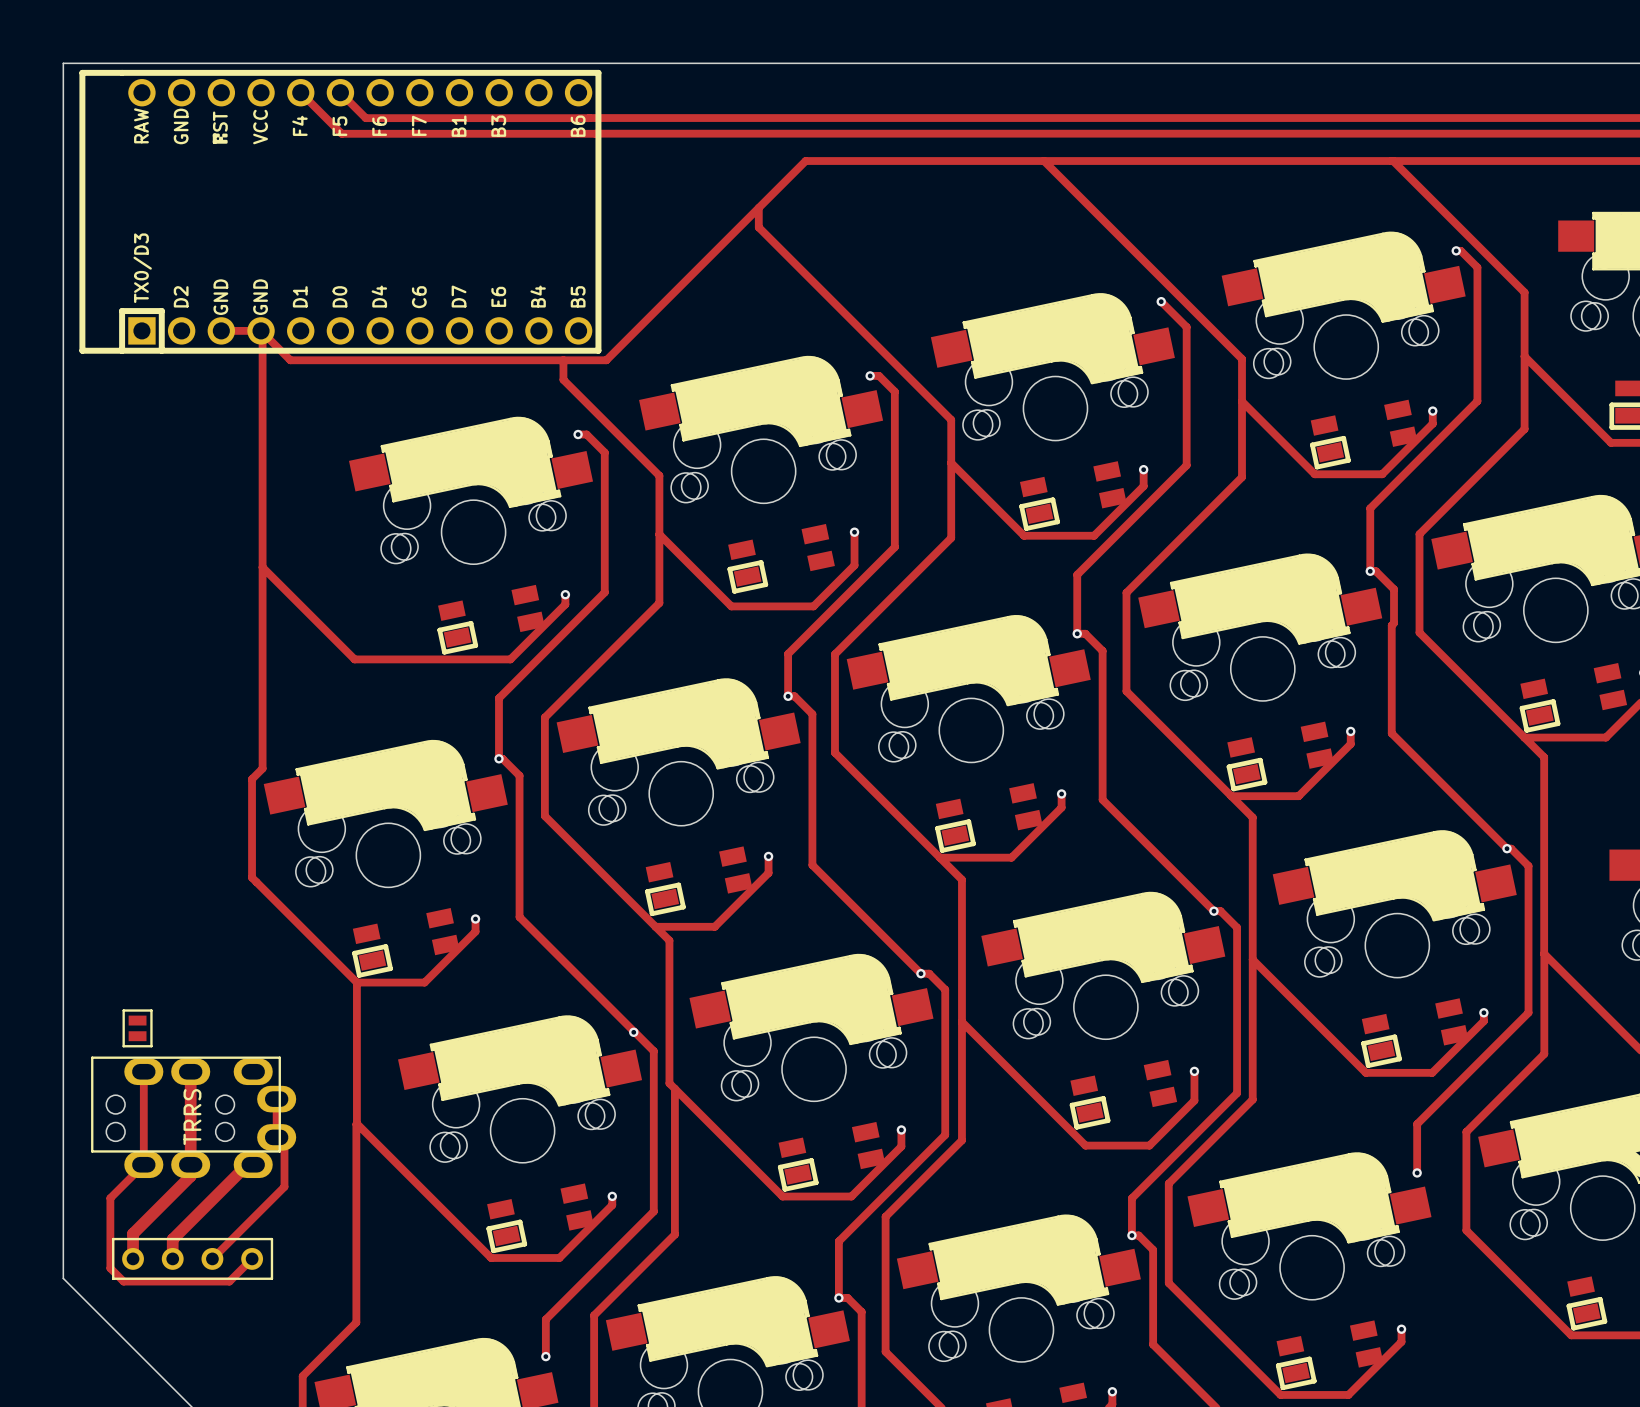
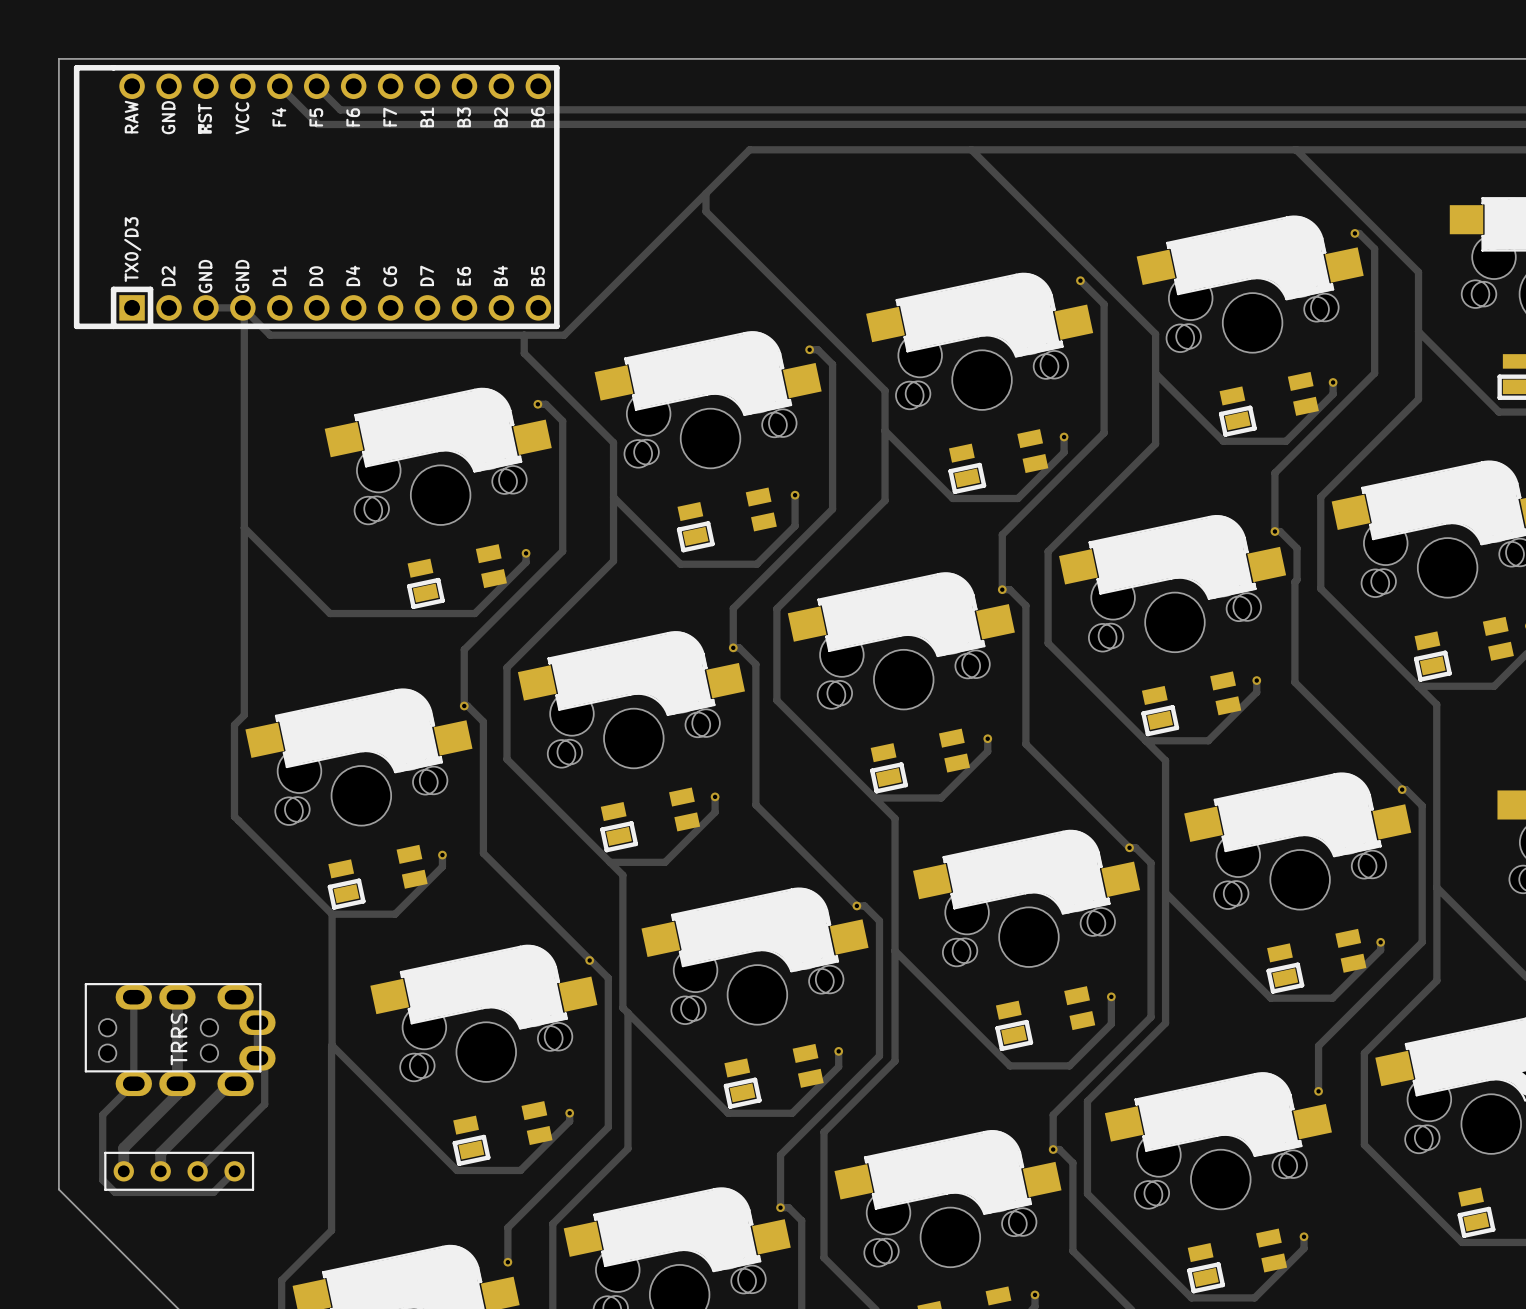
part text: none -> B2 (500, 117)
part: (137, 1028) -> none

